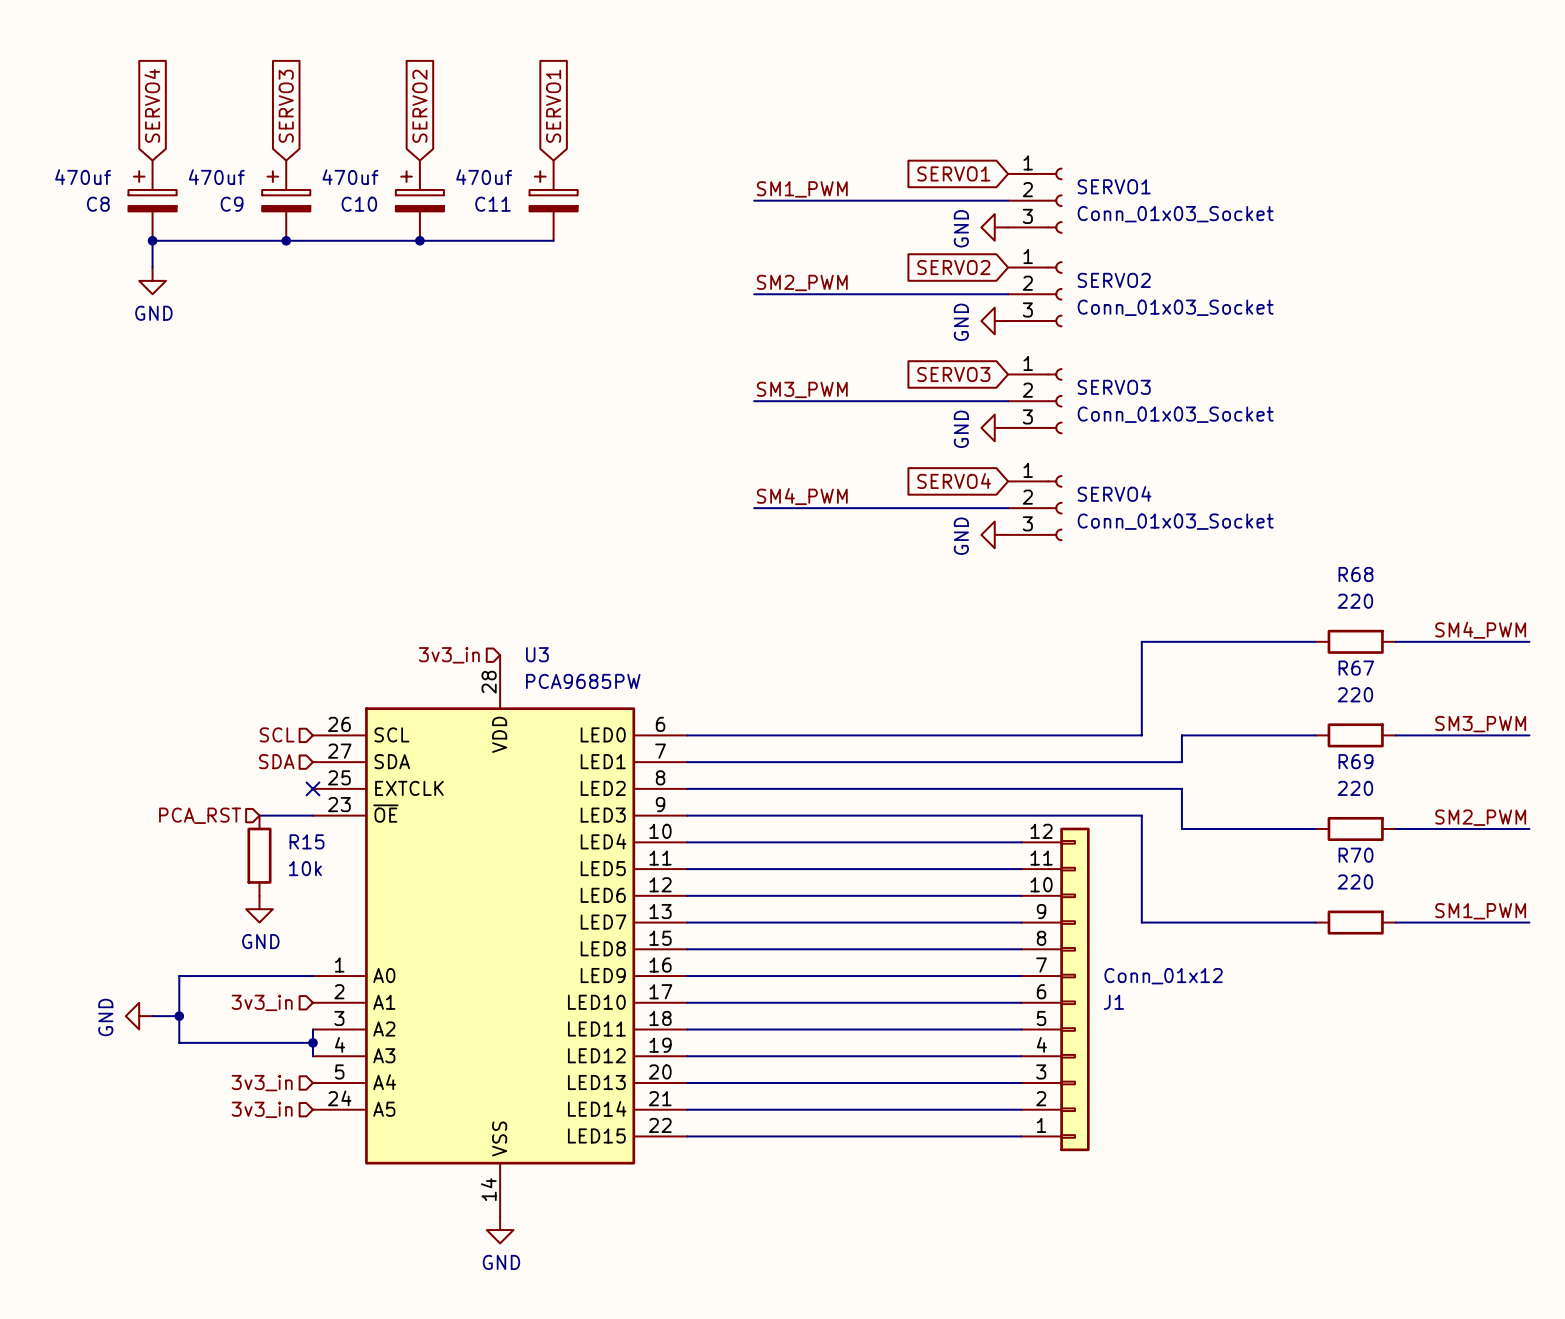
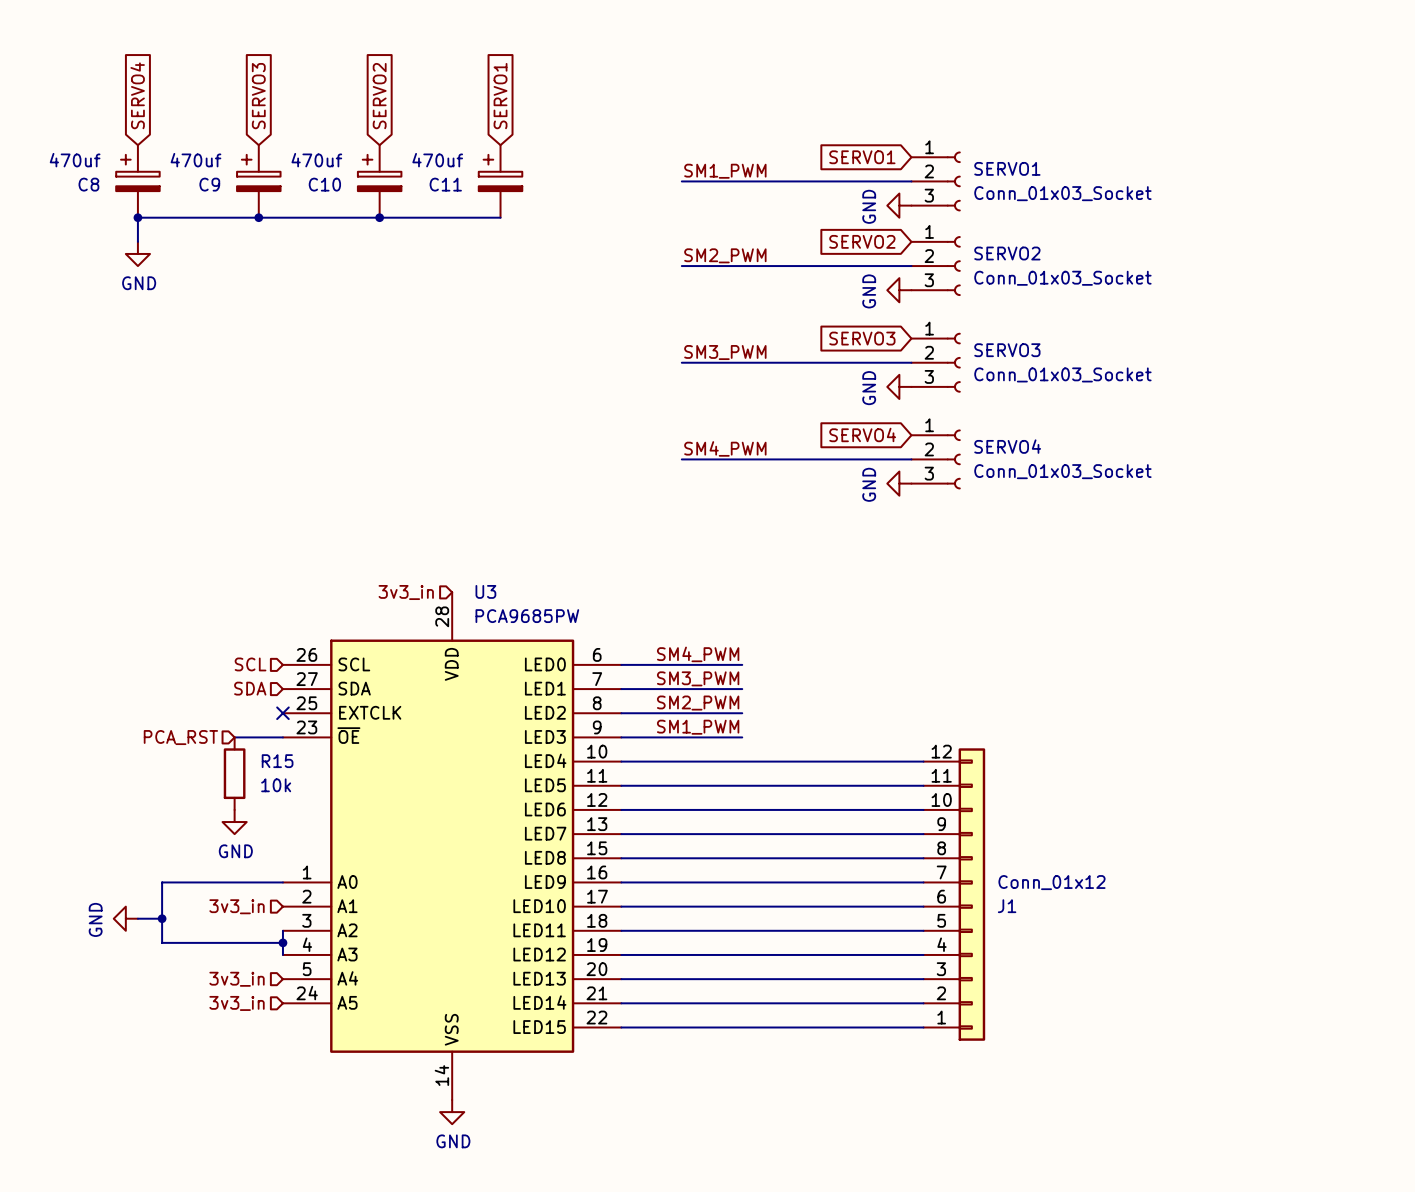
label: SM4_PWM (1480, 630) -> none
wire: (1315, 641) (1141, 641) (1141, 735) (820, 735) -> none
R68: 220 (1355, 641) -> none
wire: (1395, 641) (1529, 641) -> none
label: none -> SM4_PWM (698, 654)
label: SM3_PWM (1480, 724) -> none
wire: (1315, 735) (1181, 735) (1181, 762) (820, 762) -> none
R67: 220 (1355, 735) -> none
wire: (1395, 735) (1529, 735) -> none
label: none -> SM3_PWM (698, 678)
label: none -> SM2_PWM (698, 703)
wire: (820, 788) (1181, 788) (1181, 828) (1315, 828) -> none
label: none -> SM1_PWM (698, 727)
wire: (820, 815) (1141, 815) (1141, 922) (1315, 922) -> none
label: SM2_PWM (1480, 817) -> none
R69: 220 (1355, 828) -> none
wire: (1395, 828) (1529, 828) -> none
label: SM1_PWM (1480, 911) -> none
R70: 220 (1355, 922) -> none
wire: (1395, 922) (1529, 922) -> none

